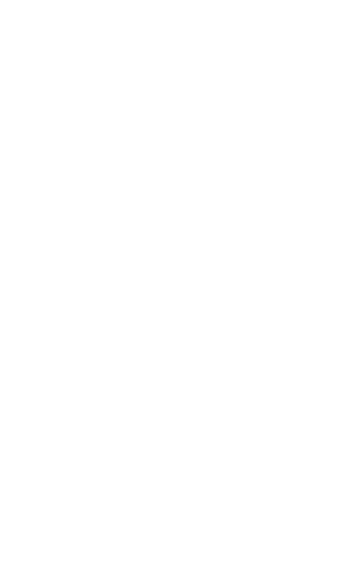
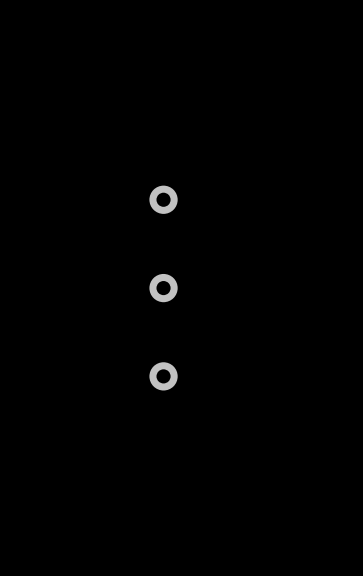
via: none -> (163, 199)
via: none -> (163, 288)
via: none -> (163, 376)

